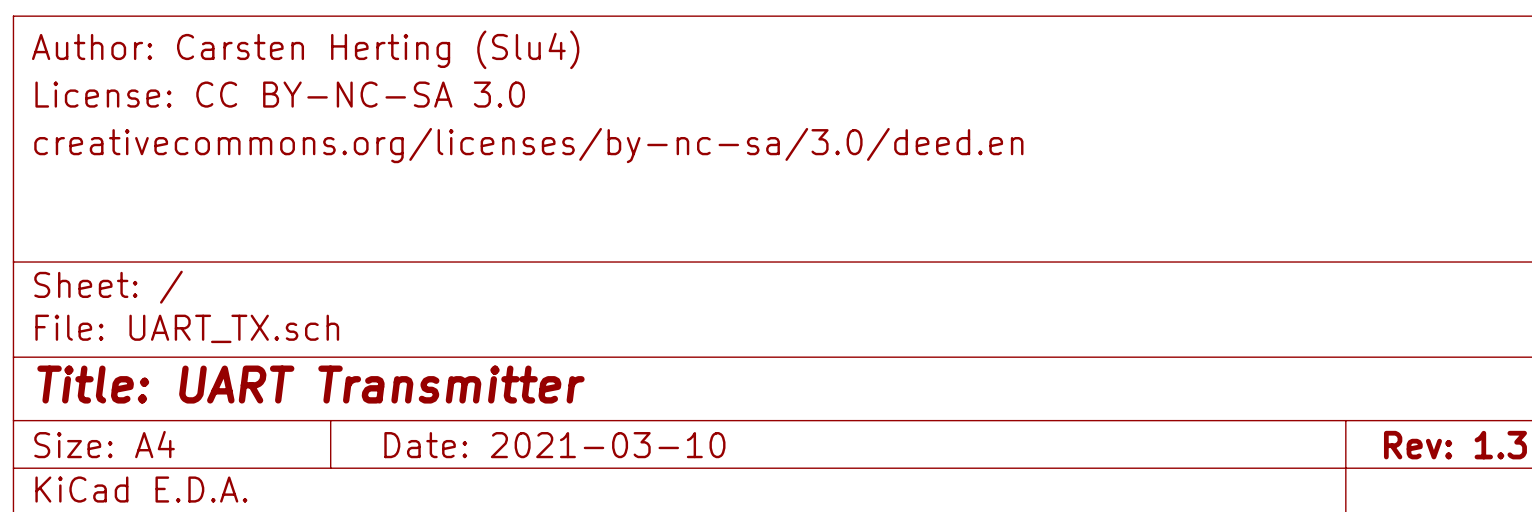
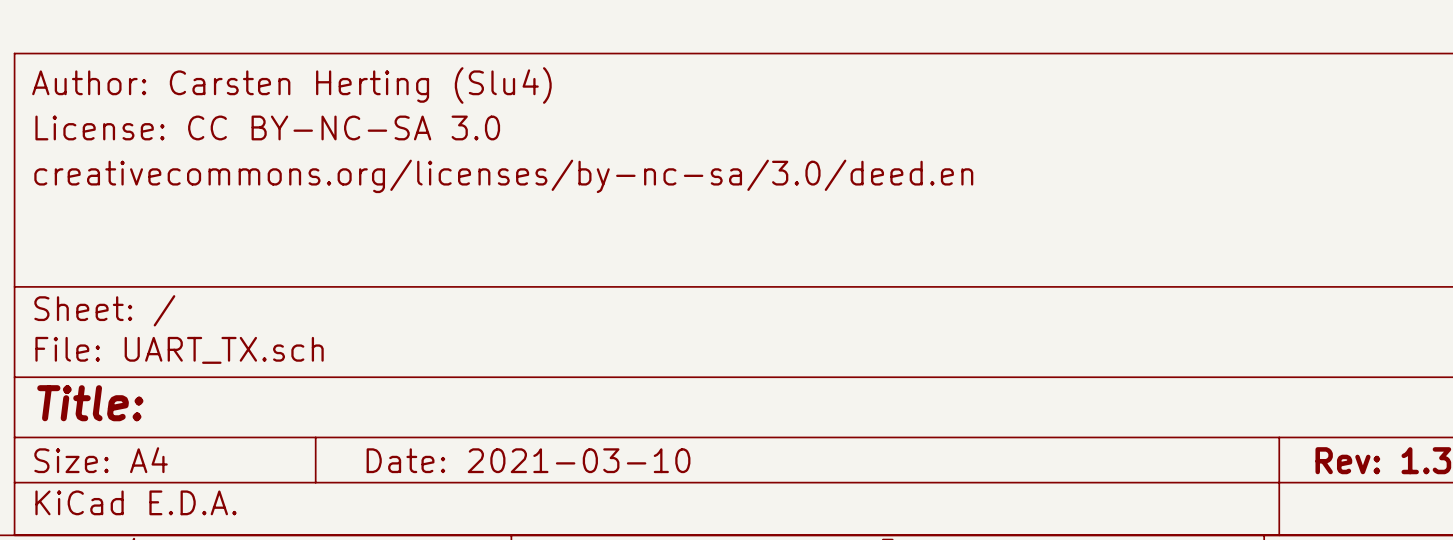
title block: Title: UART Transmitter (310, 384) -> Title: (90, 403)

